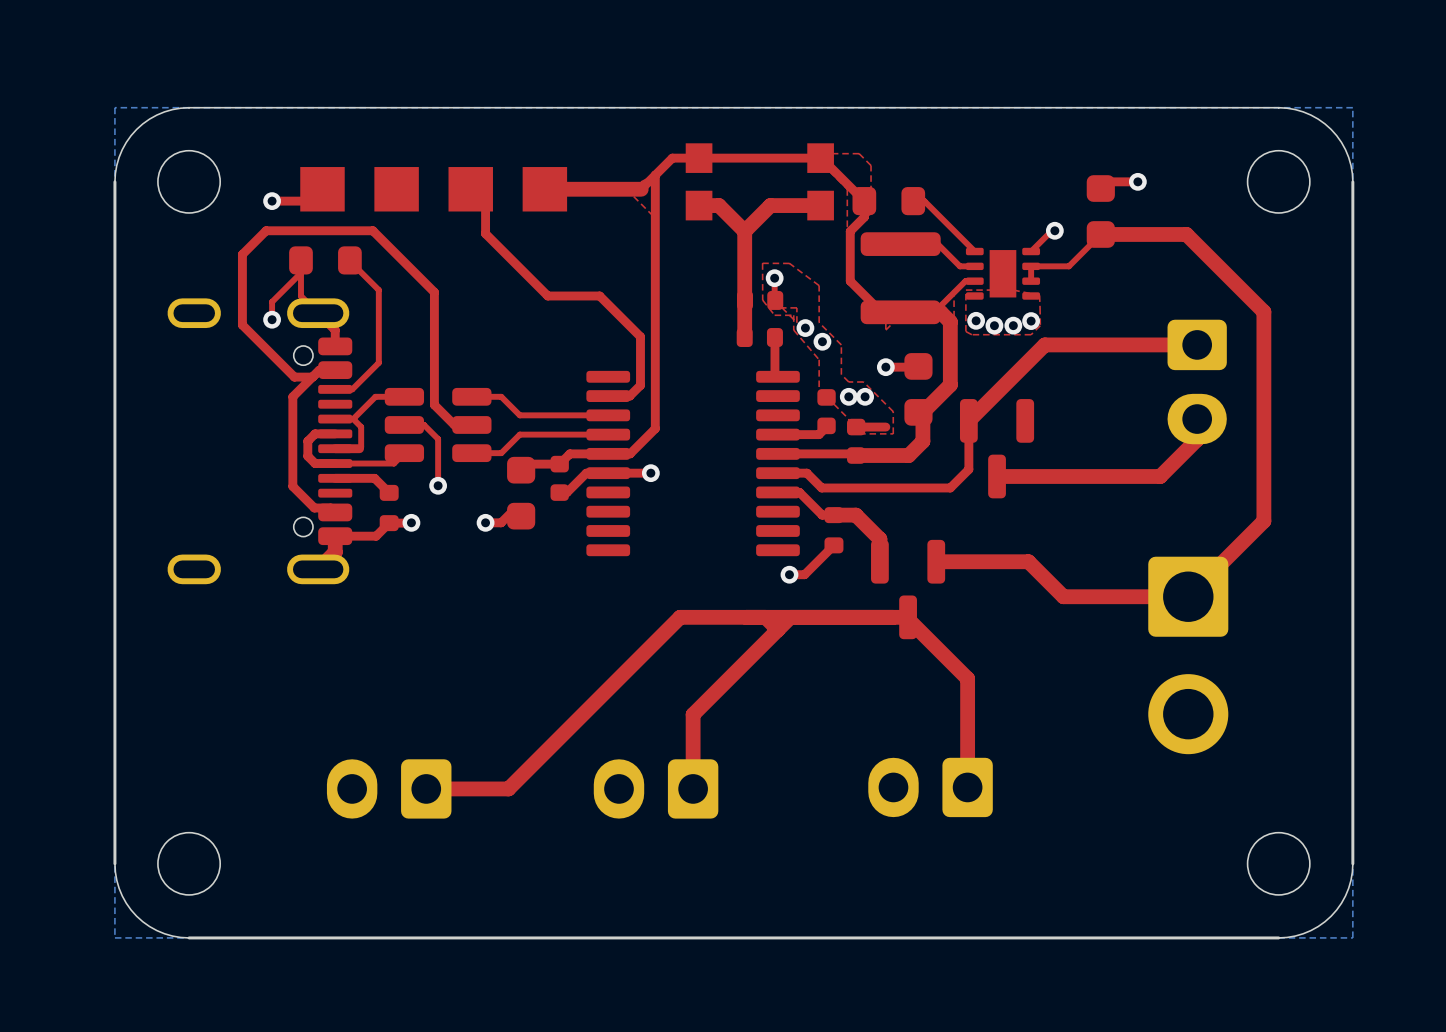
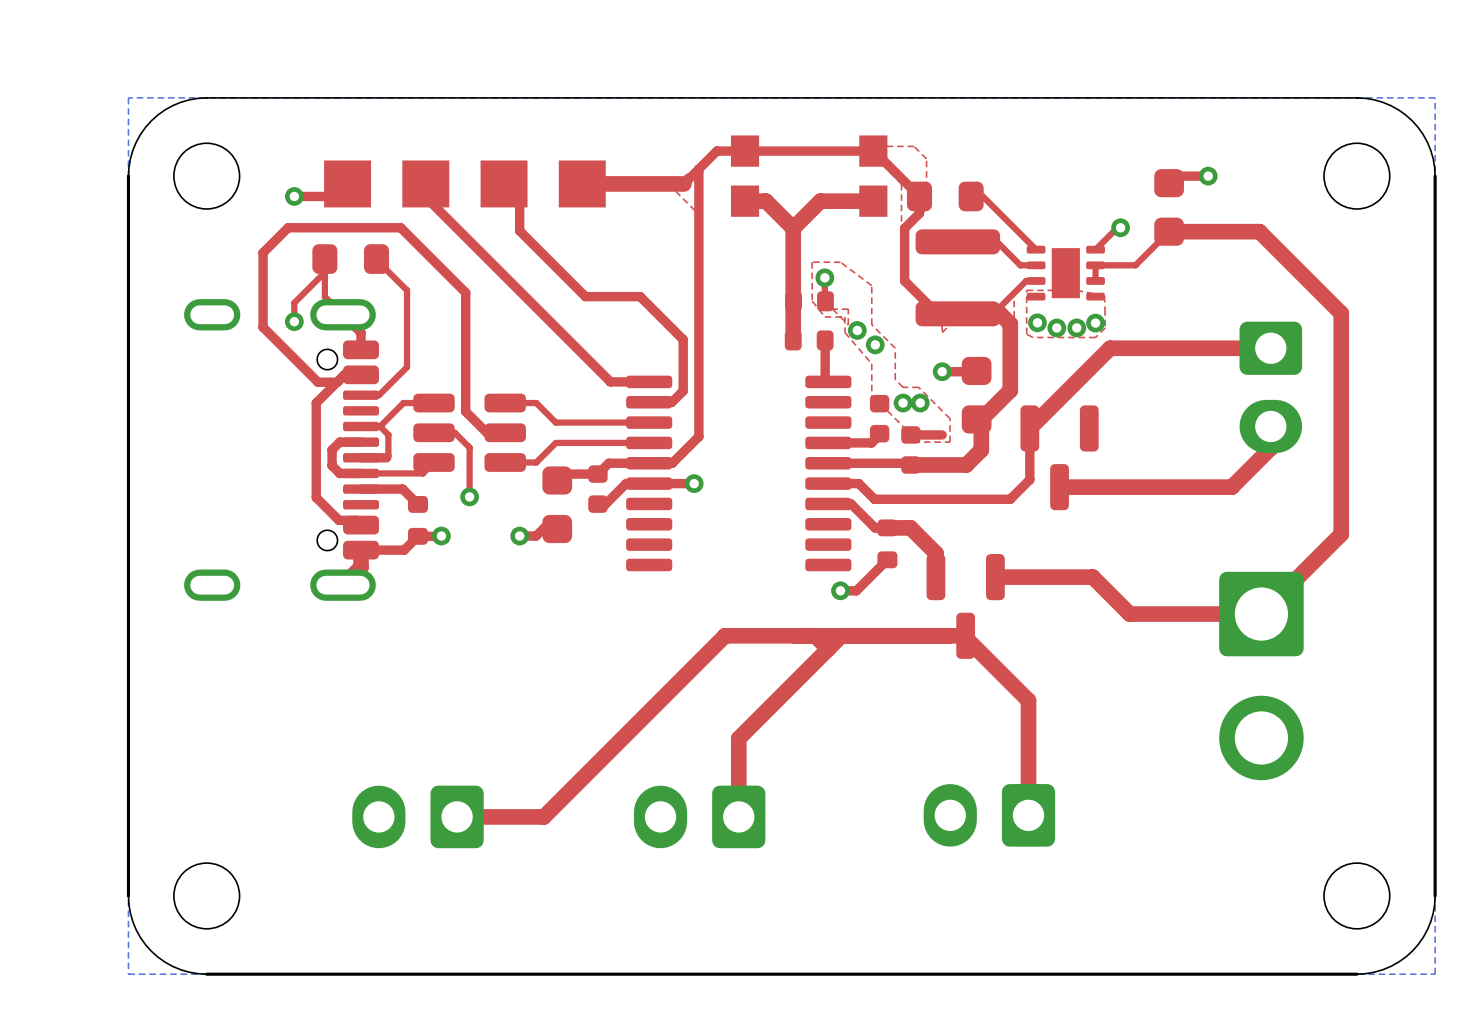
top track: none -> (425, 183) (425, 197) (610, 381) (649, 381)

